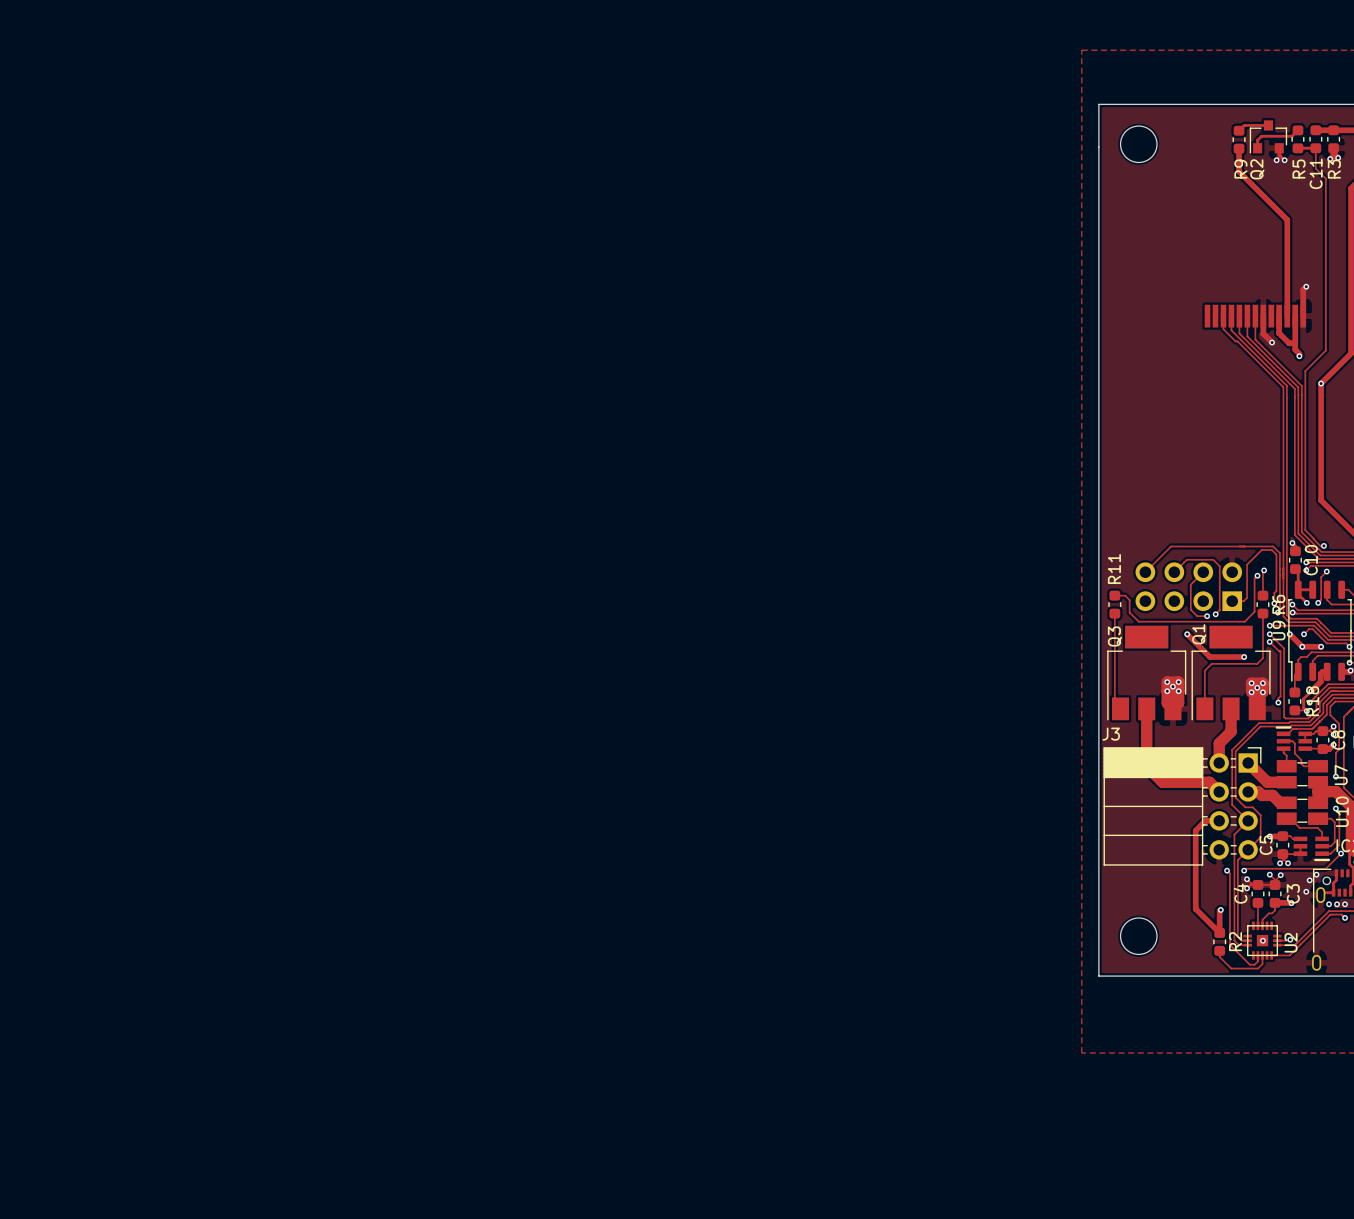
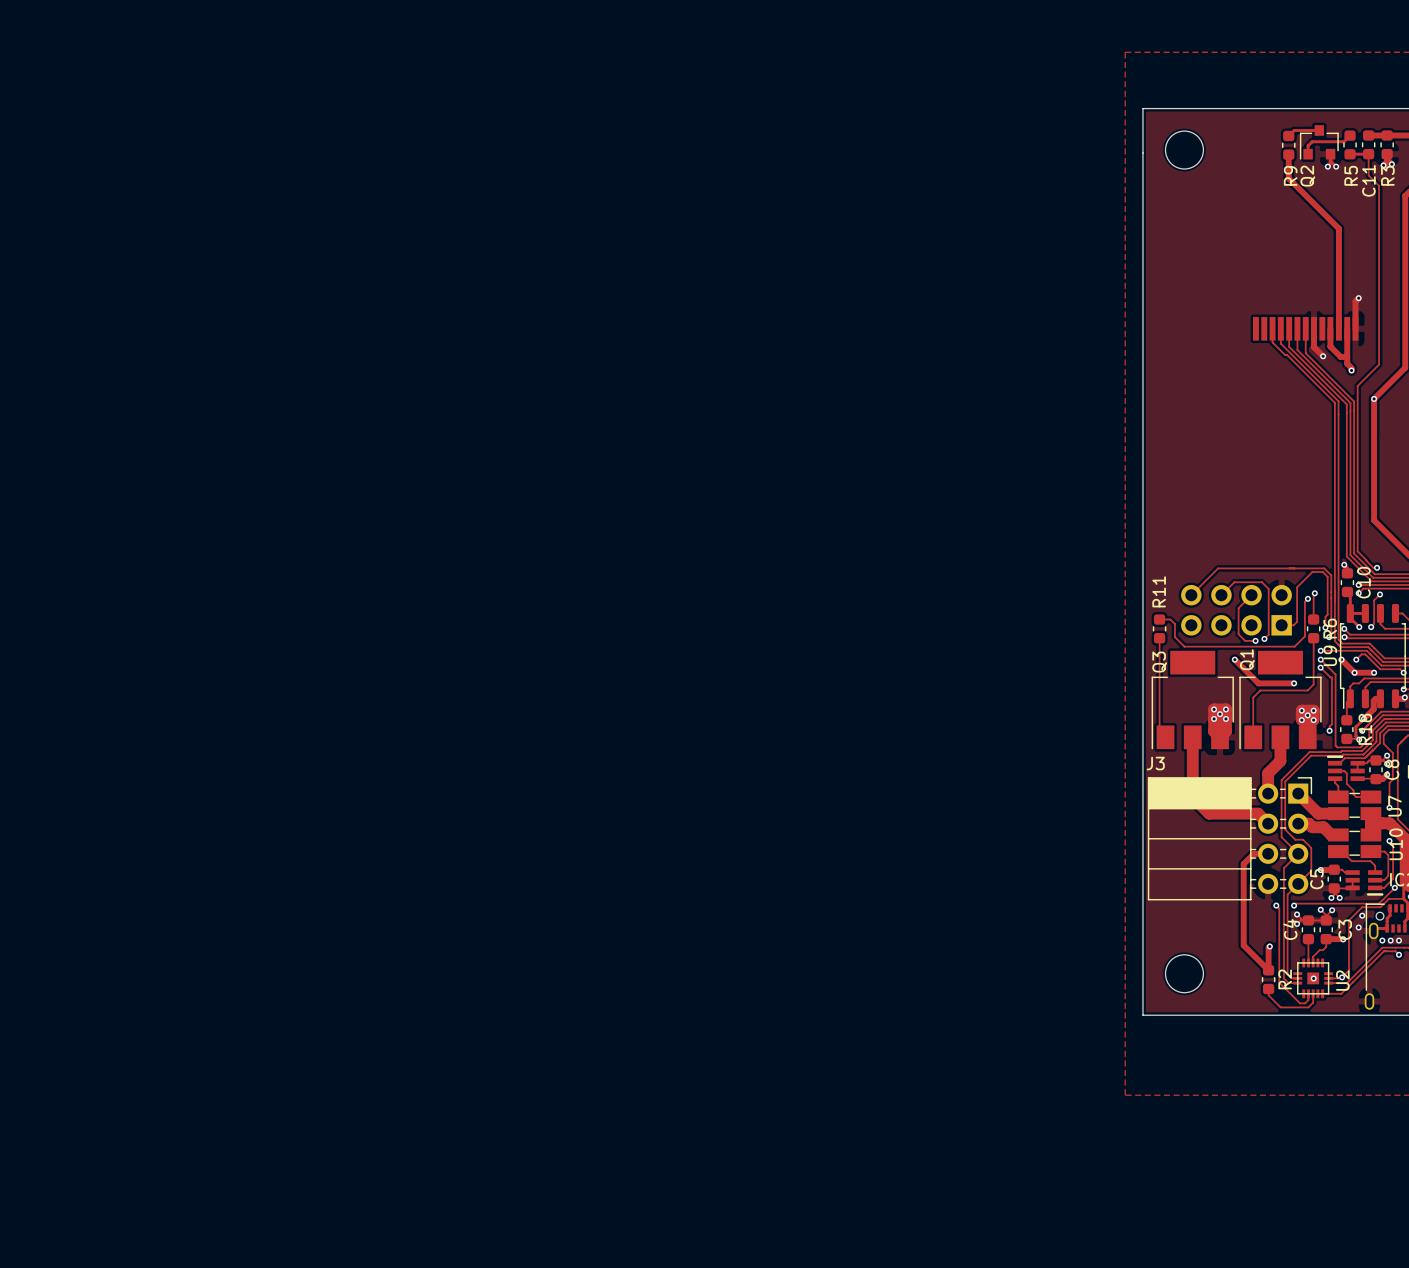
track: none -> (1403, 898) (1388, 898) (1380, 907) (1362, 907) (1349, 920) (1349, 970) (1342, 977)
via: (1316, 874) -> none

